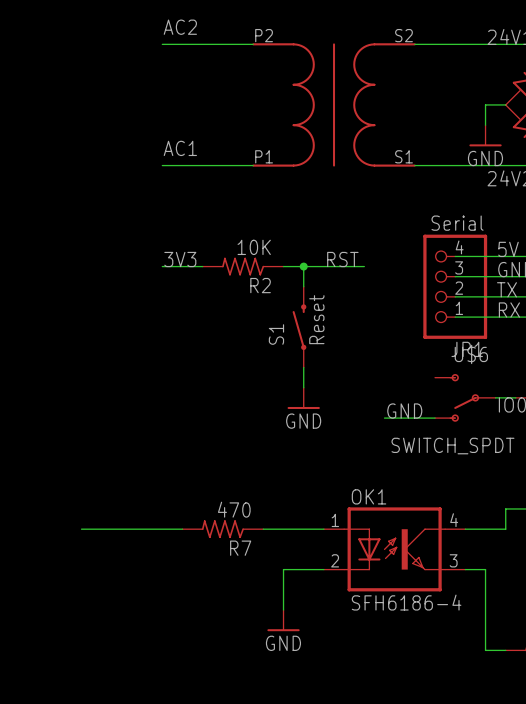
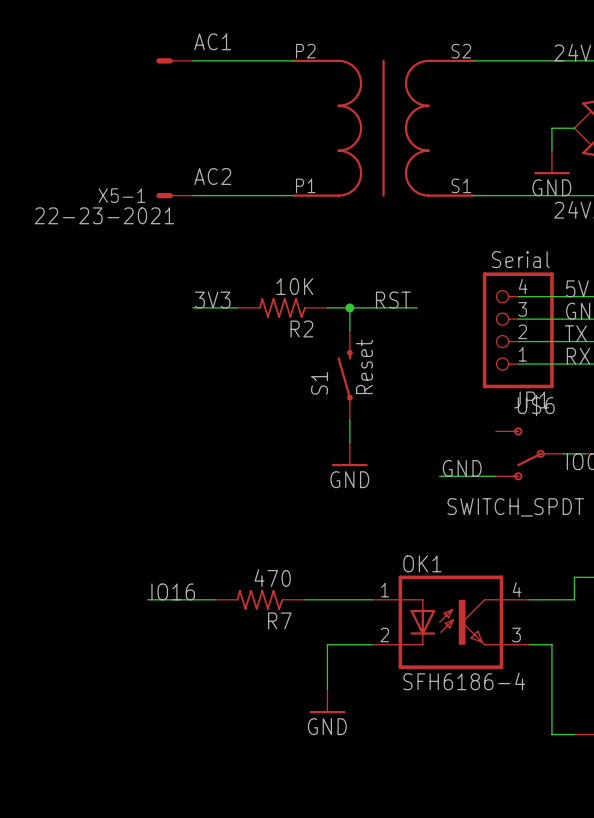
label: AC2 (180, 27) -> AC1 (212, 41)
part: none -> (174, 60)
label: AC1 (180, 148) -> AC2 (212, 176)
X5-1: none -> 22-23-2021 (174, 195)
label: none -> IO16 (173, 591)
wire: (81, 529) (121, 529) -> none

